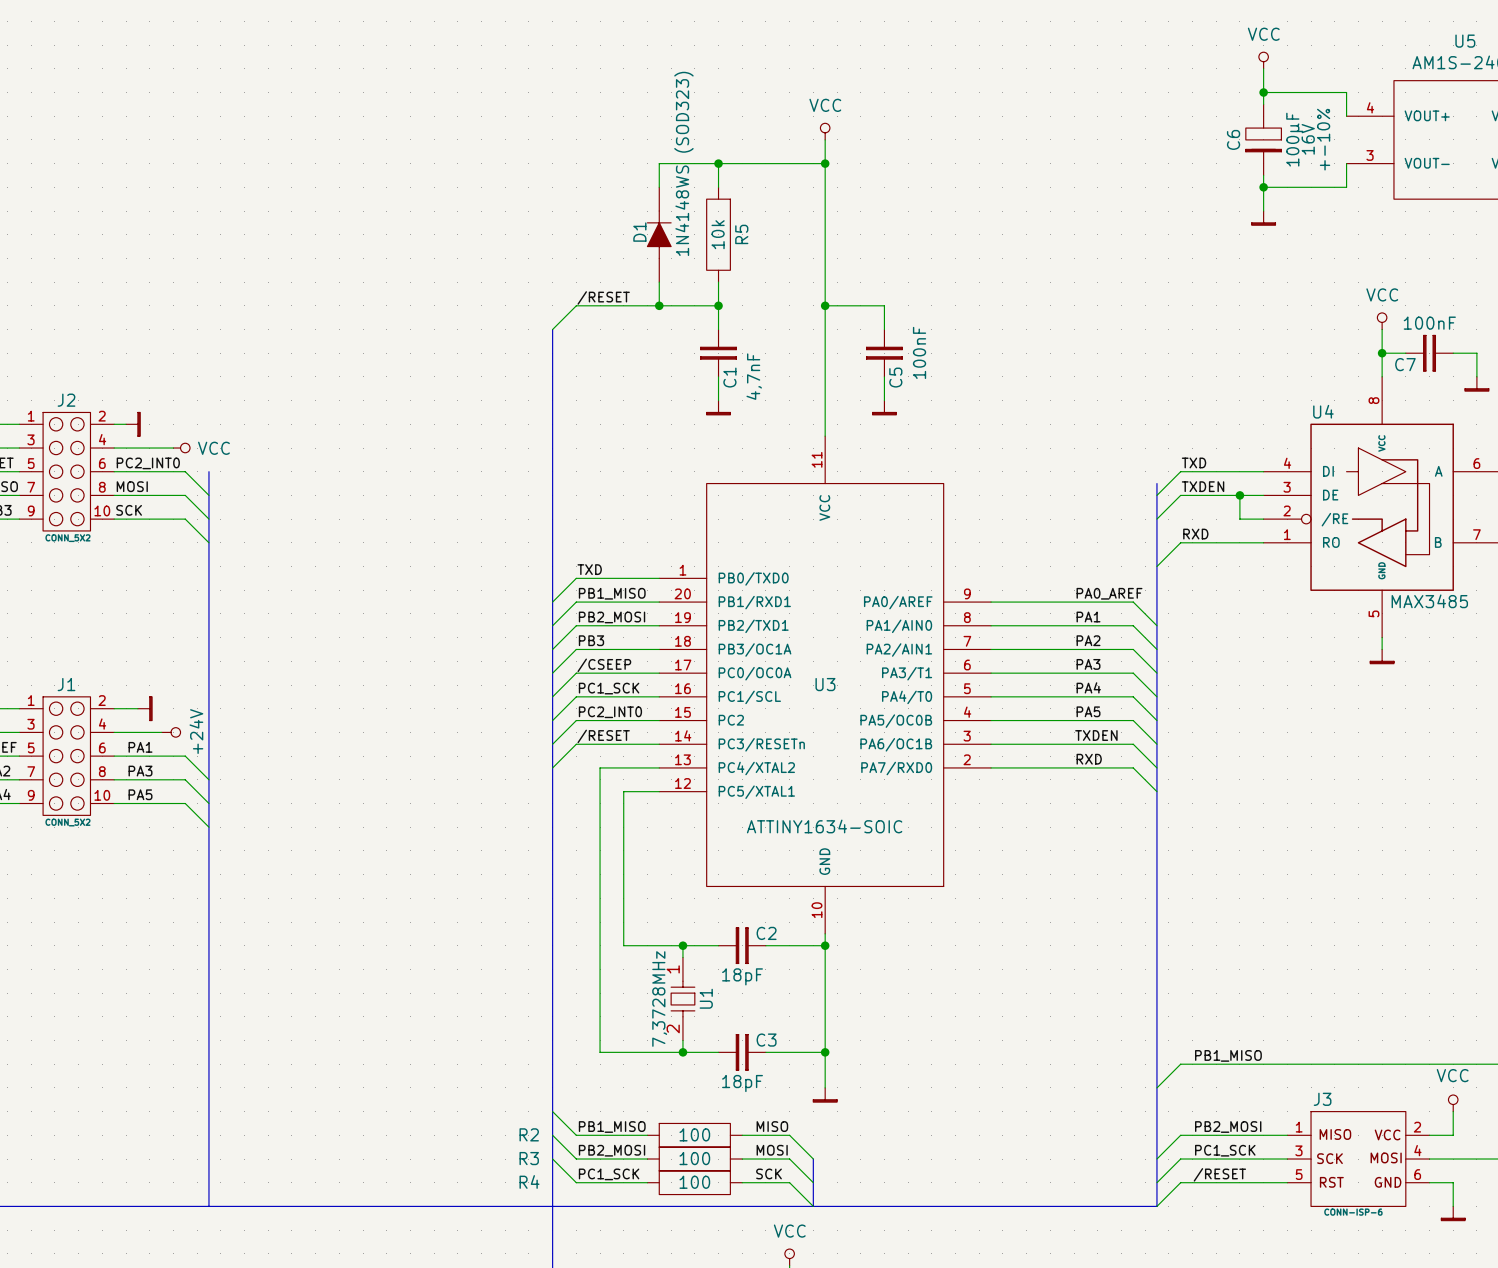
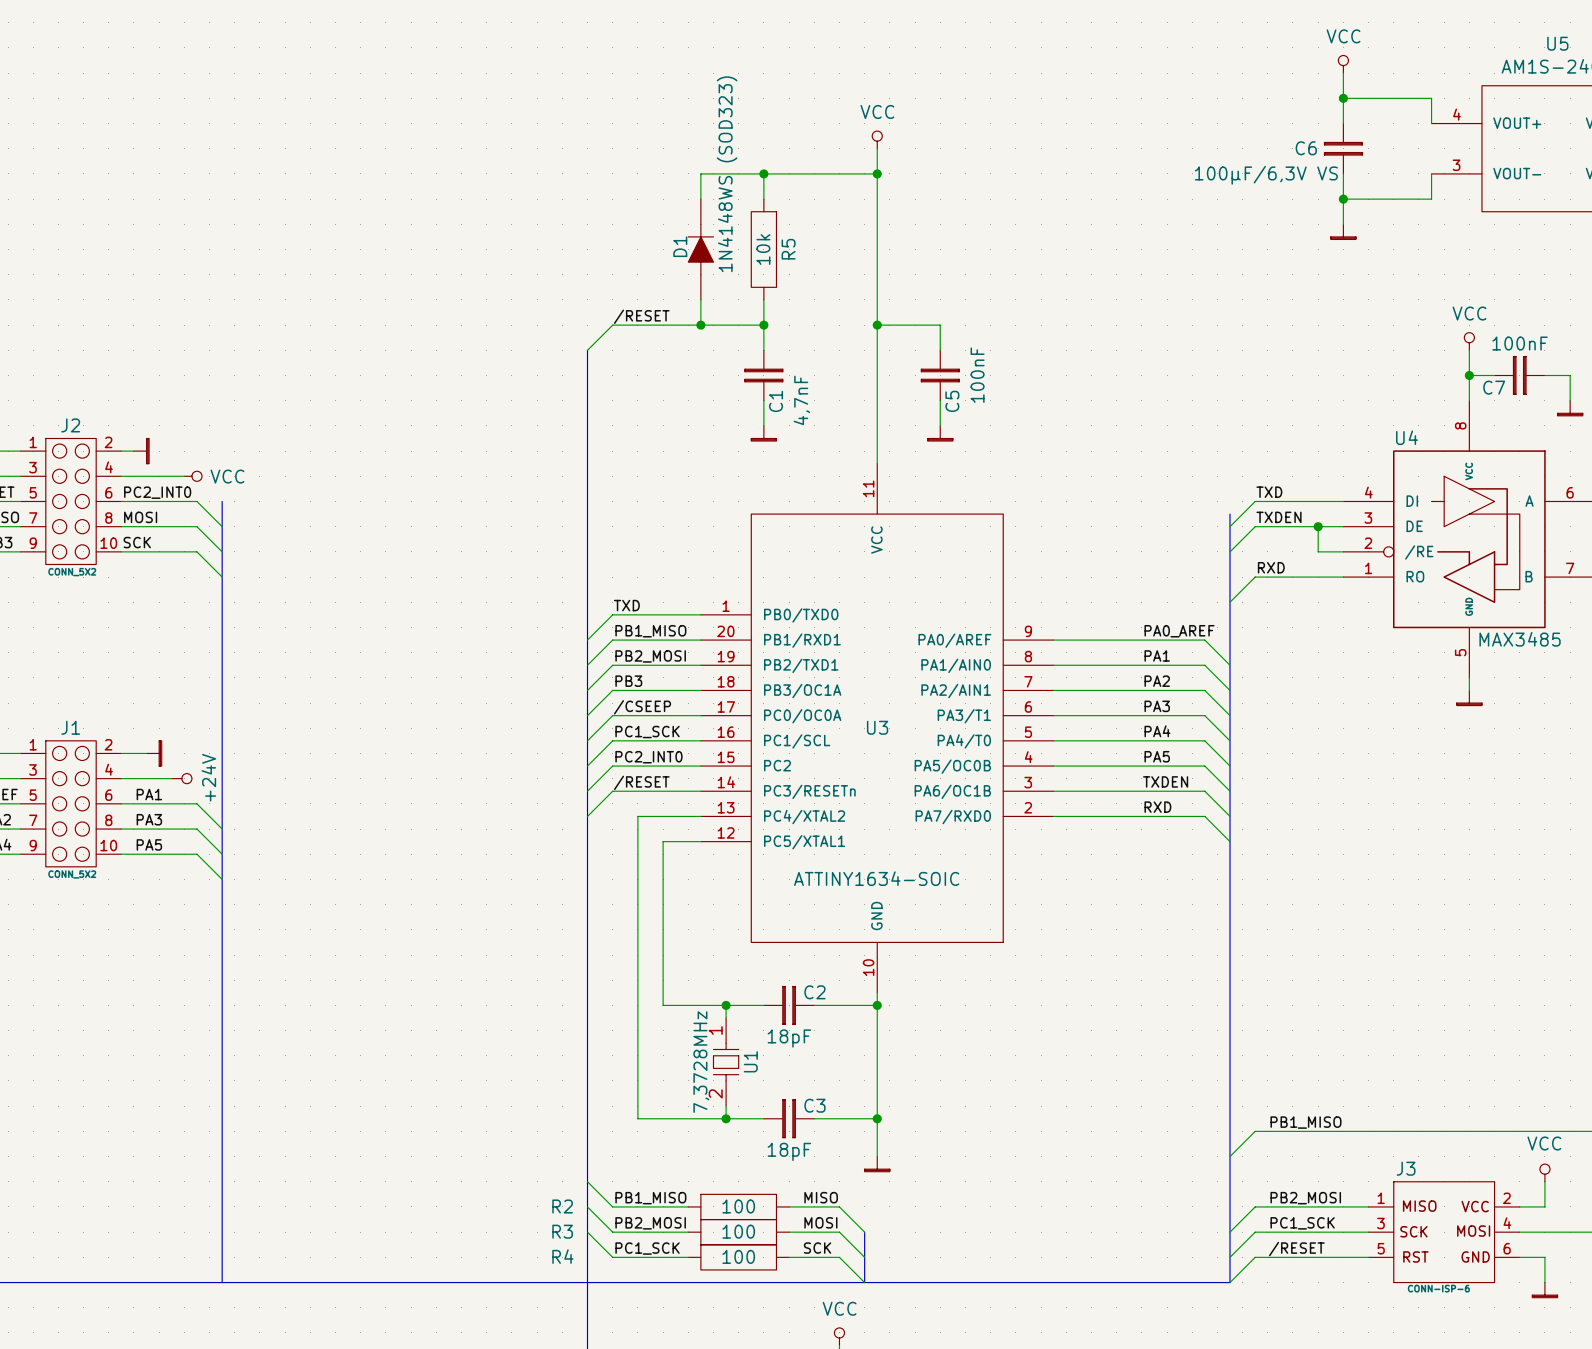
C6 symbol: [1245, 104, 1282, 176] -> [1324, 123, 1363, 174]
C6 value: 100µF (1294, 139) -> 100µF/6,3V VS (1266, 175)
C6 text: 16V (1308, 139) -> none
C6 text: +-10% (1323, 139) -> none

